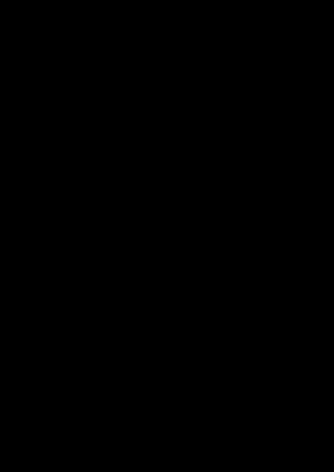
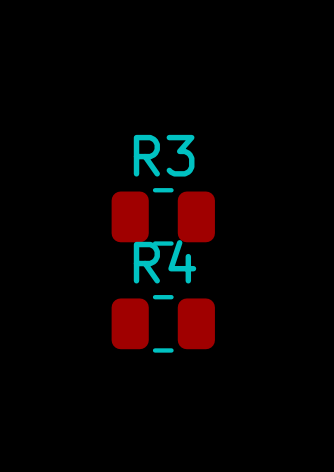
R3: none -> (163, 216)
R4: none -> (163, 323)

